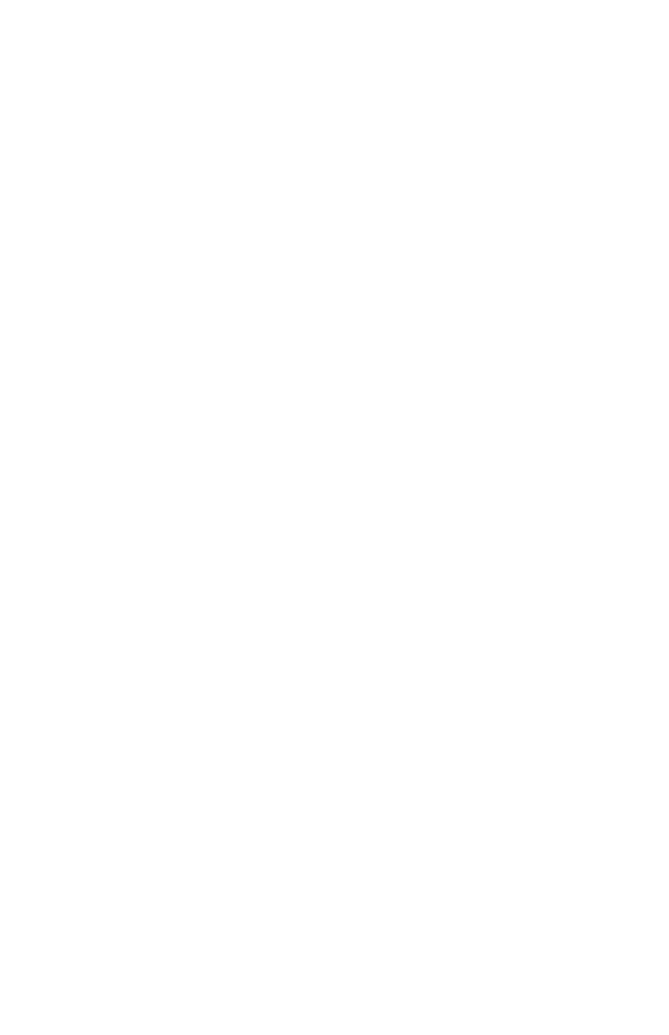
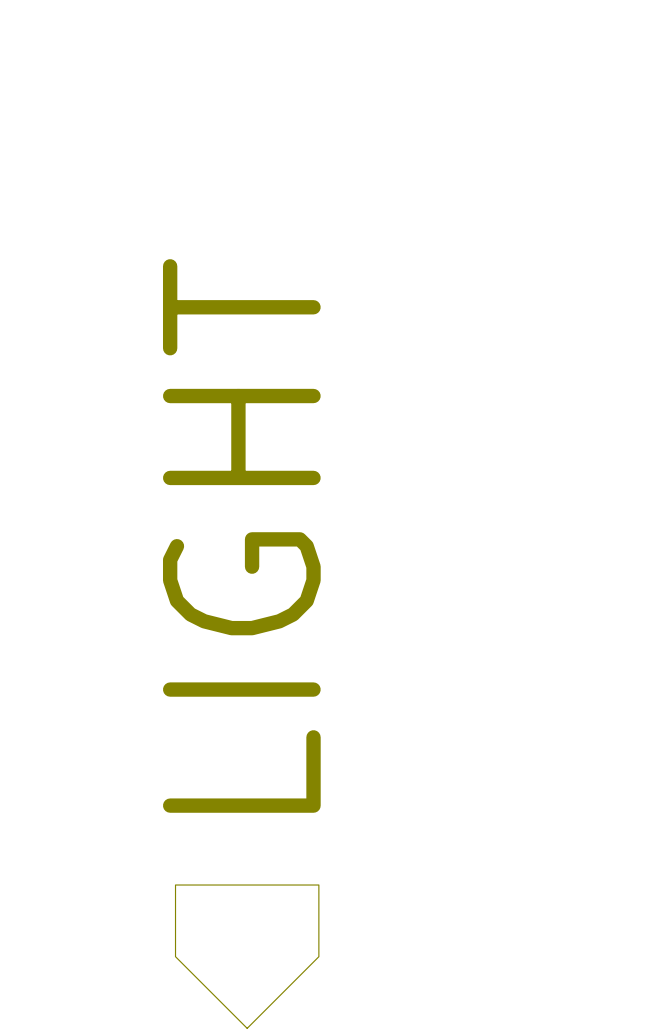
hierarchical label: none -> LIGHT (241, 535)

